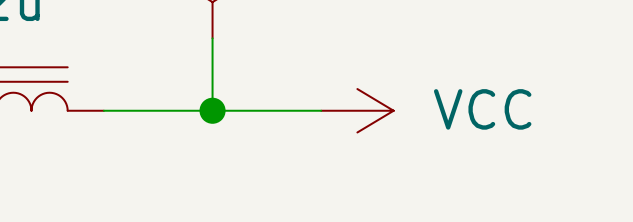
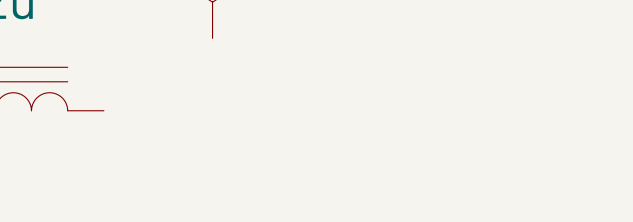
wire: (212, 38) (212, 110) -> none
wire: (103, 110) (321, 110) -> none
junction: (212, 110) -> none
power symbol: VCC (357, 110) -> none

